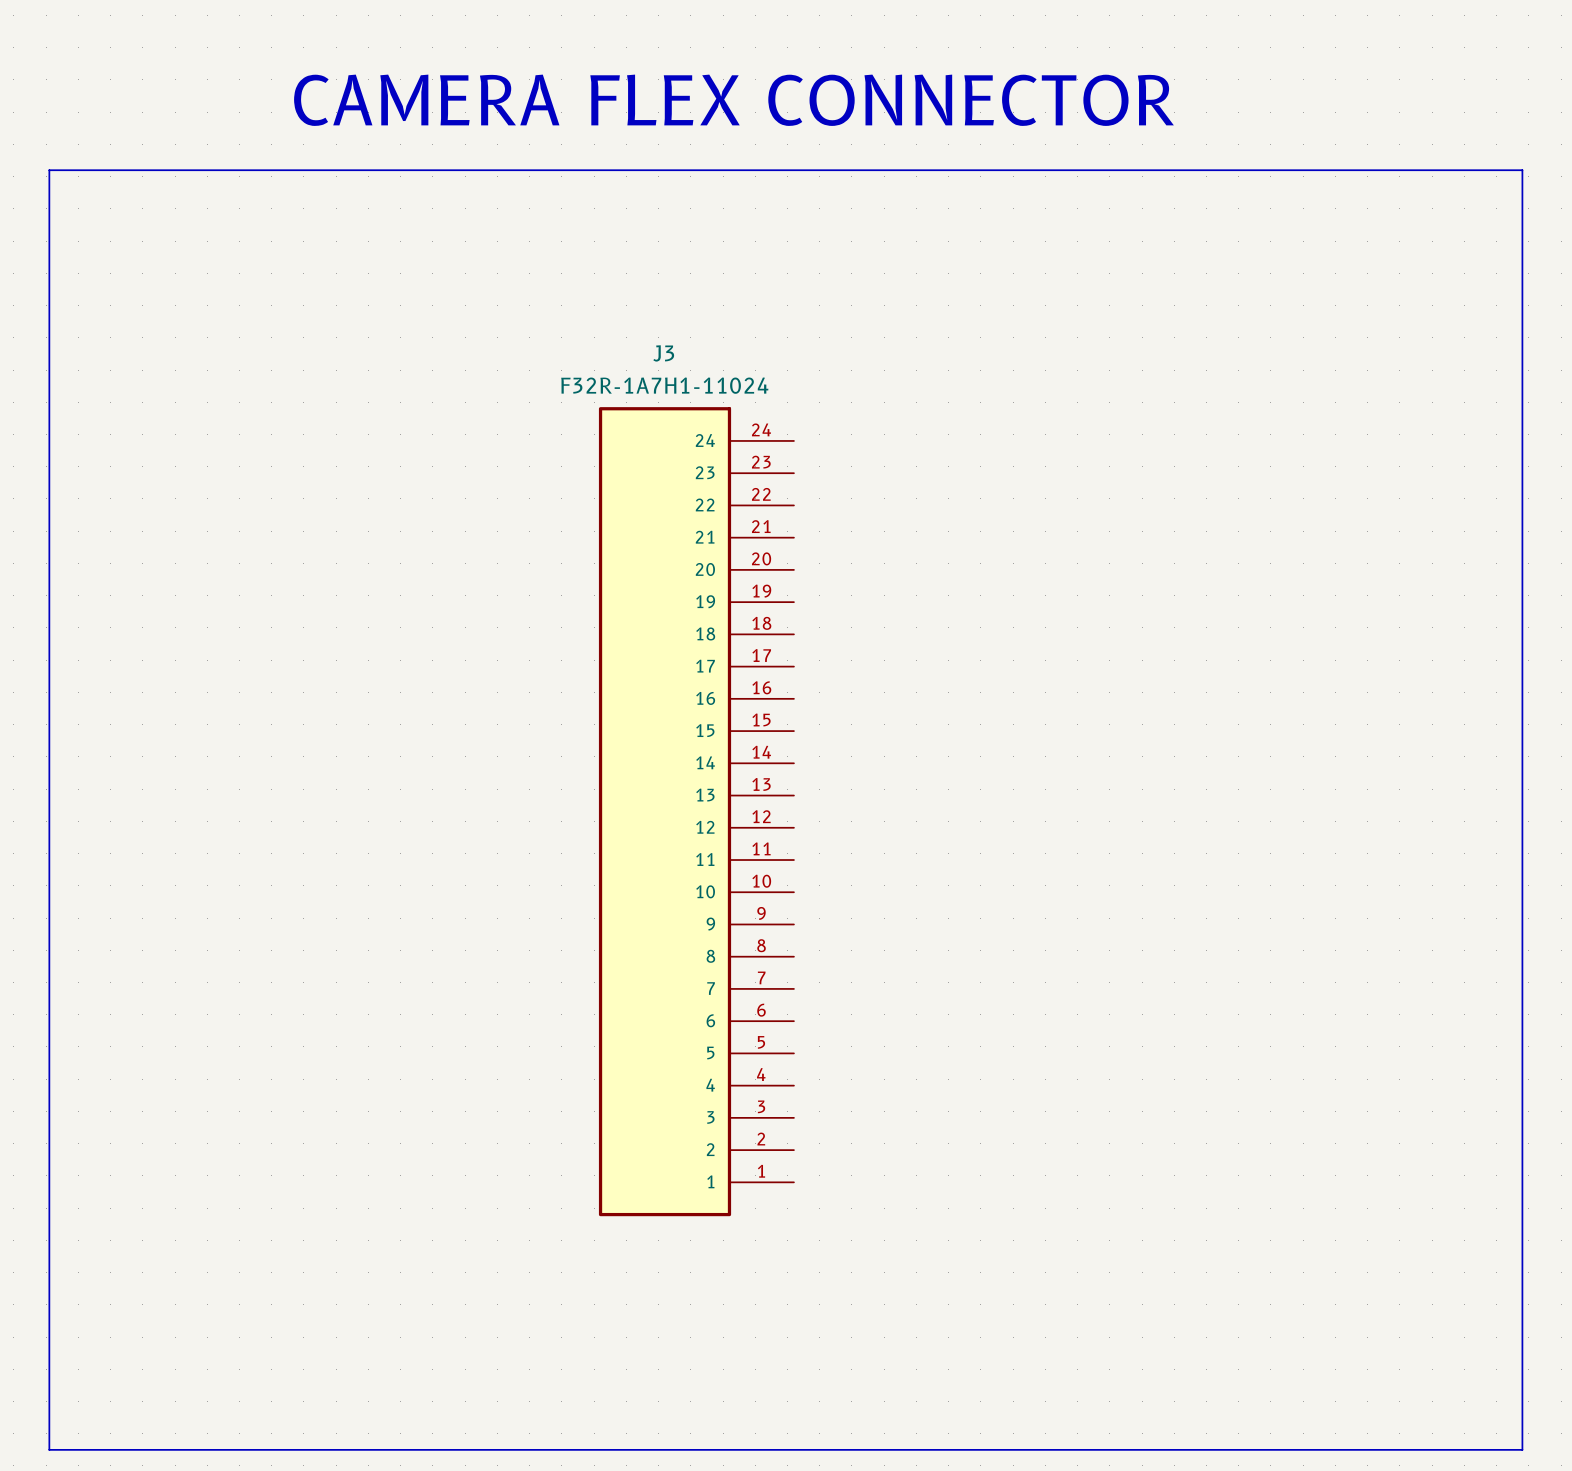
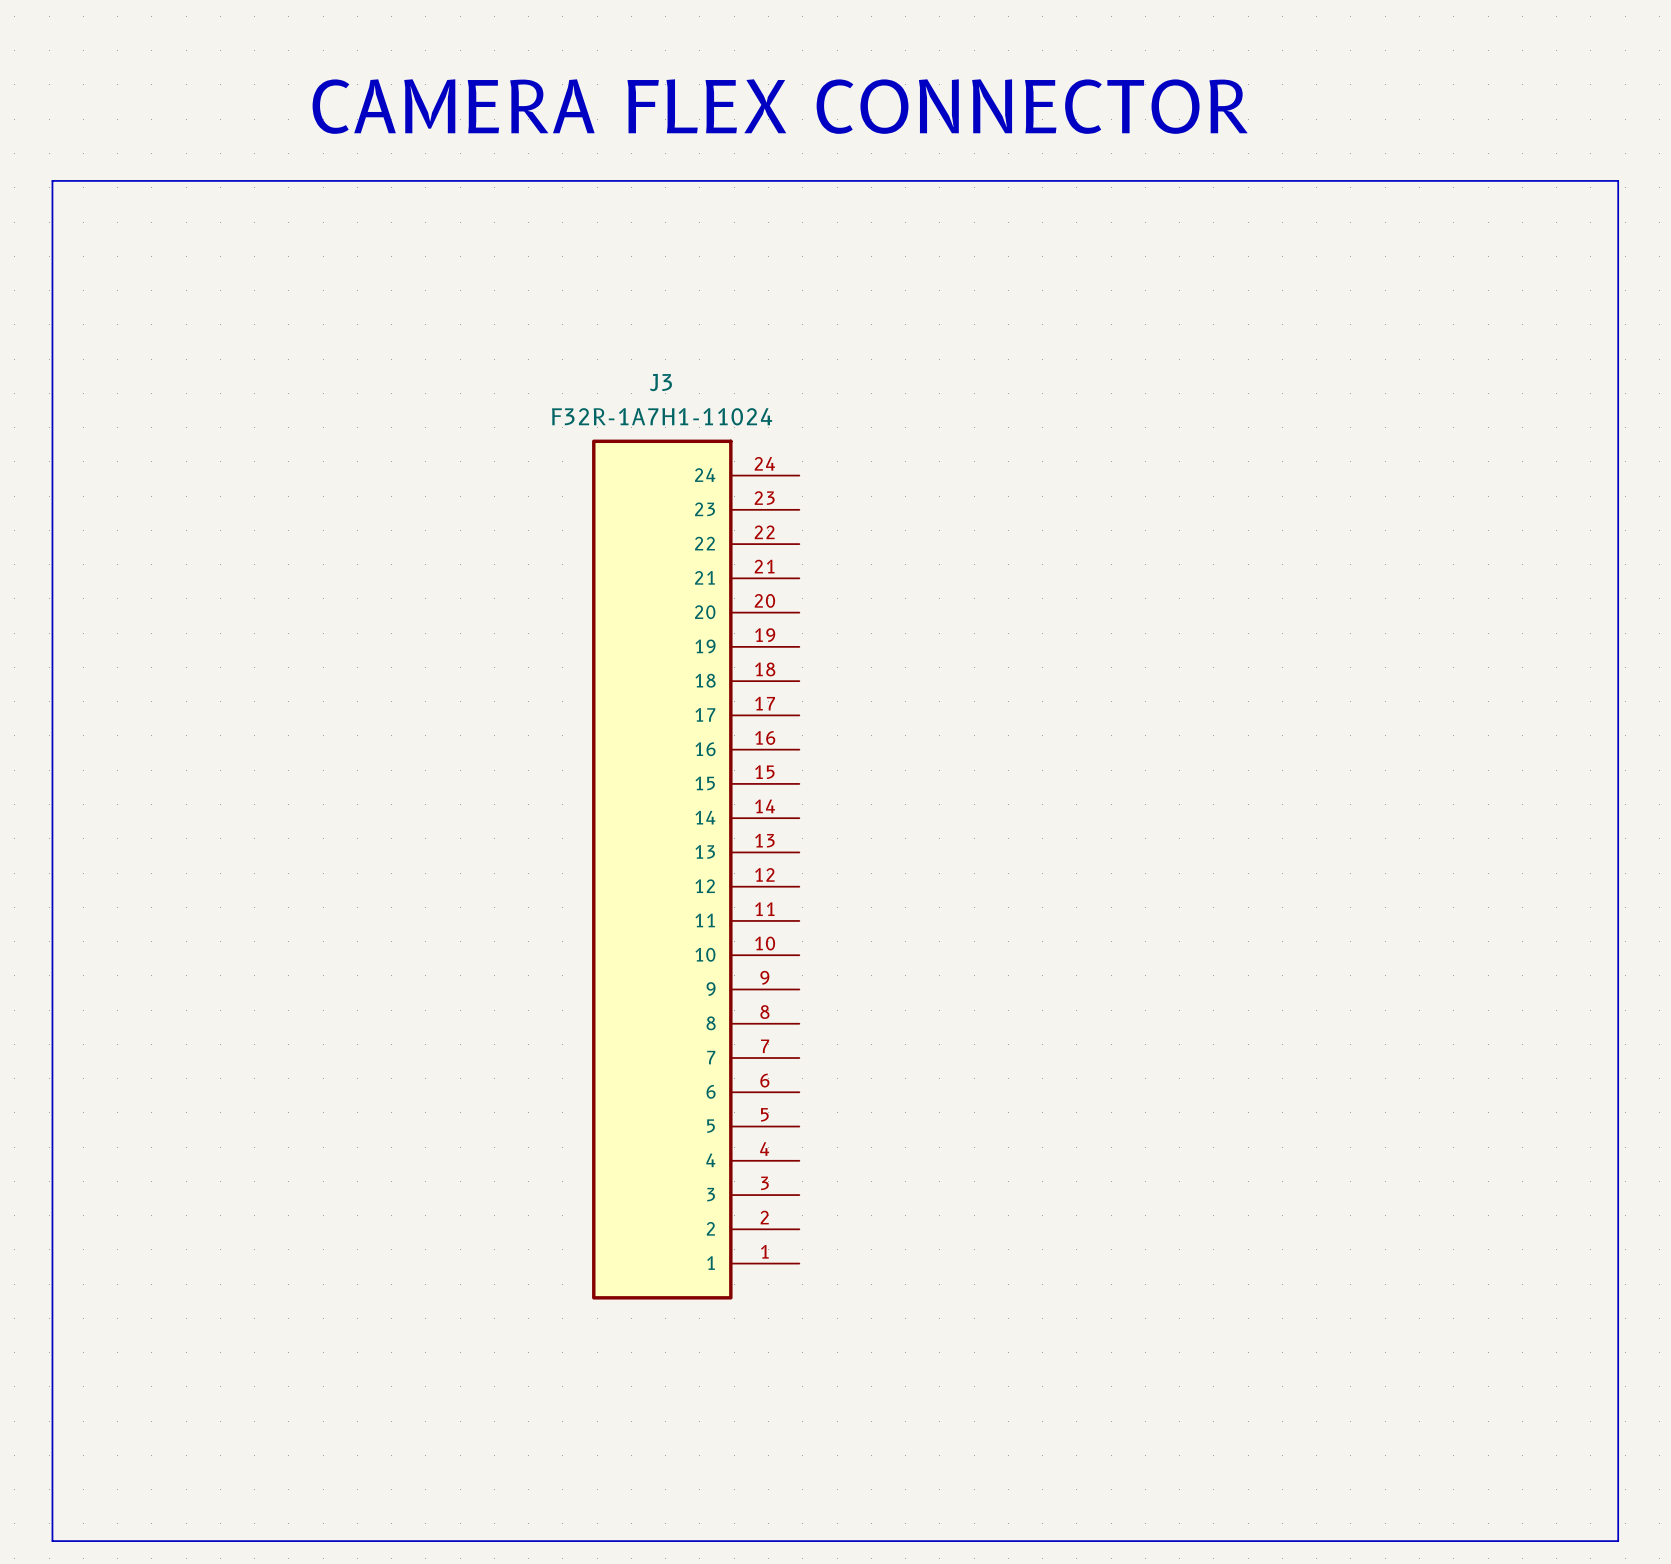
J3 position: (696, 811) -> (695, 869)

